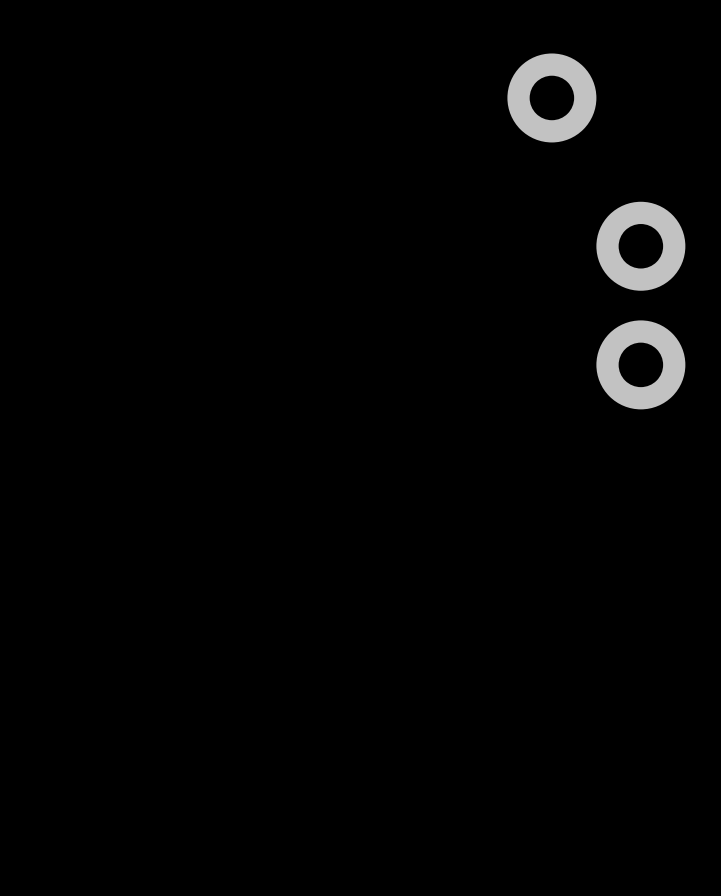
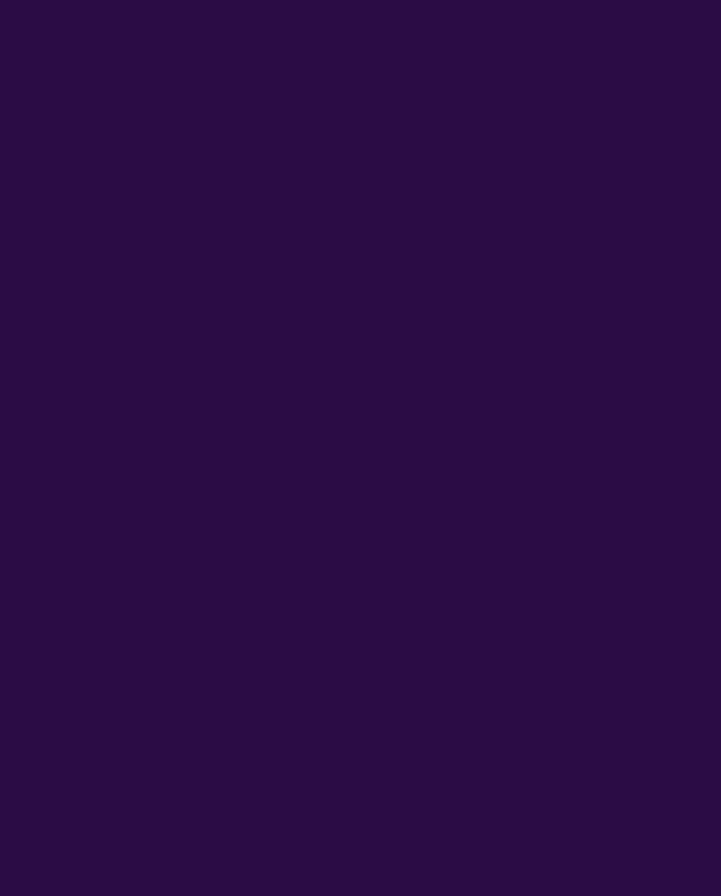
via: (551, 97) -> none
via: (640, 246) -> none
via: (640, 364) -> none

